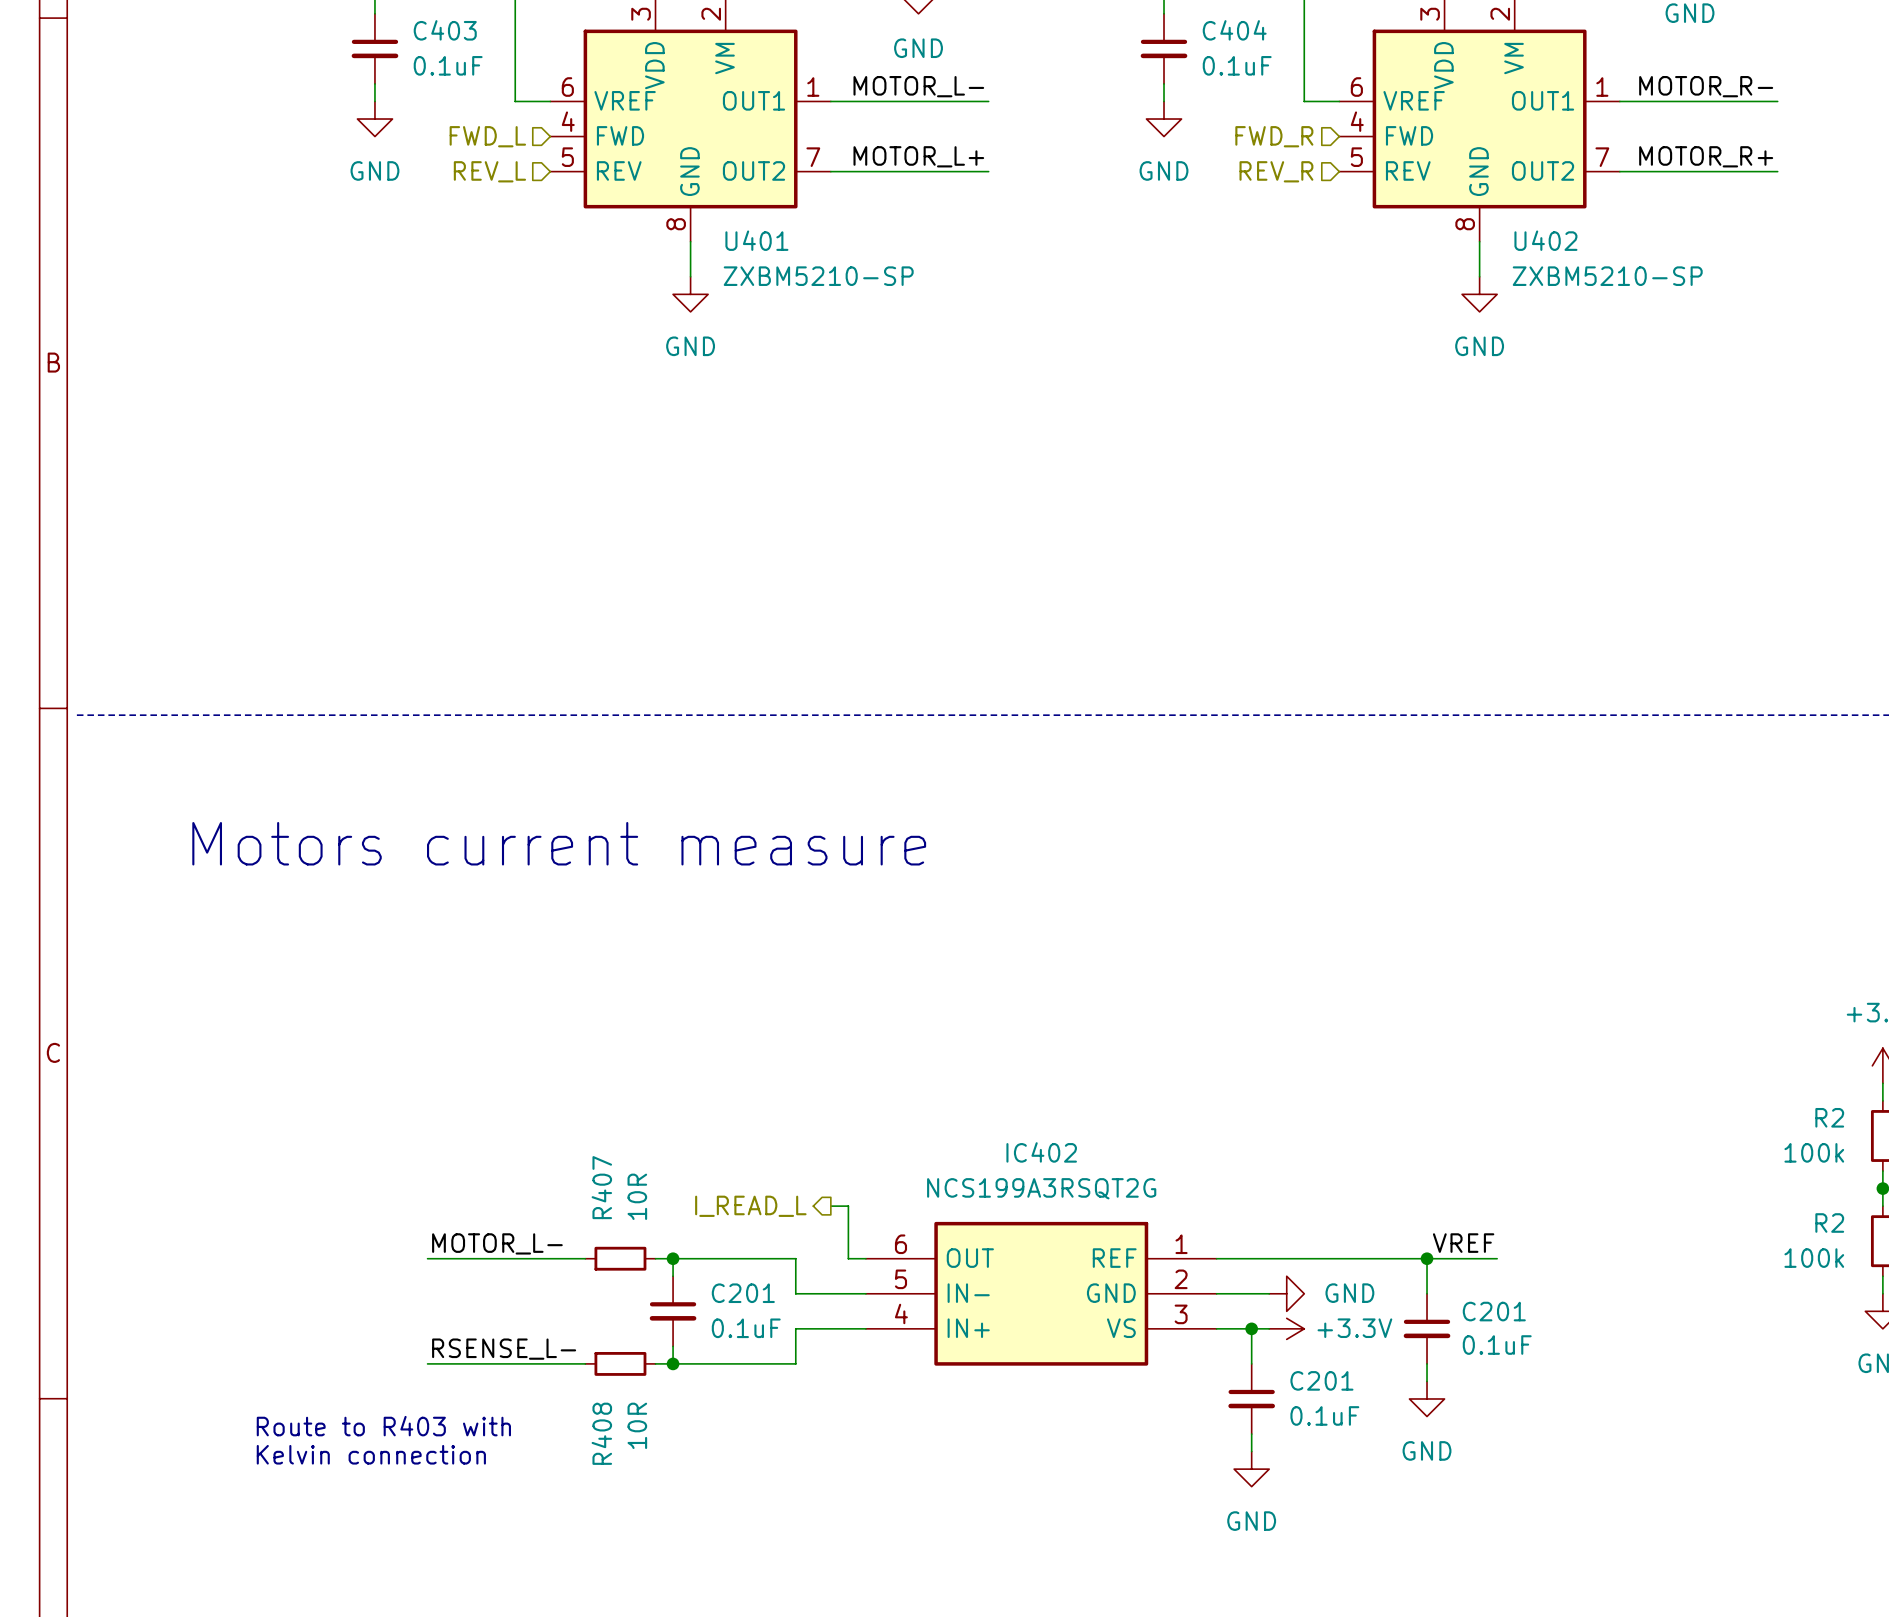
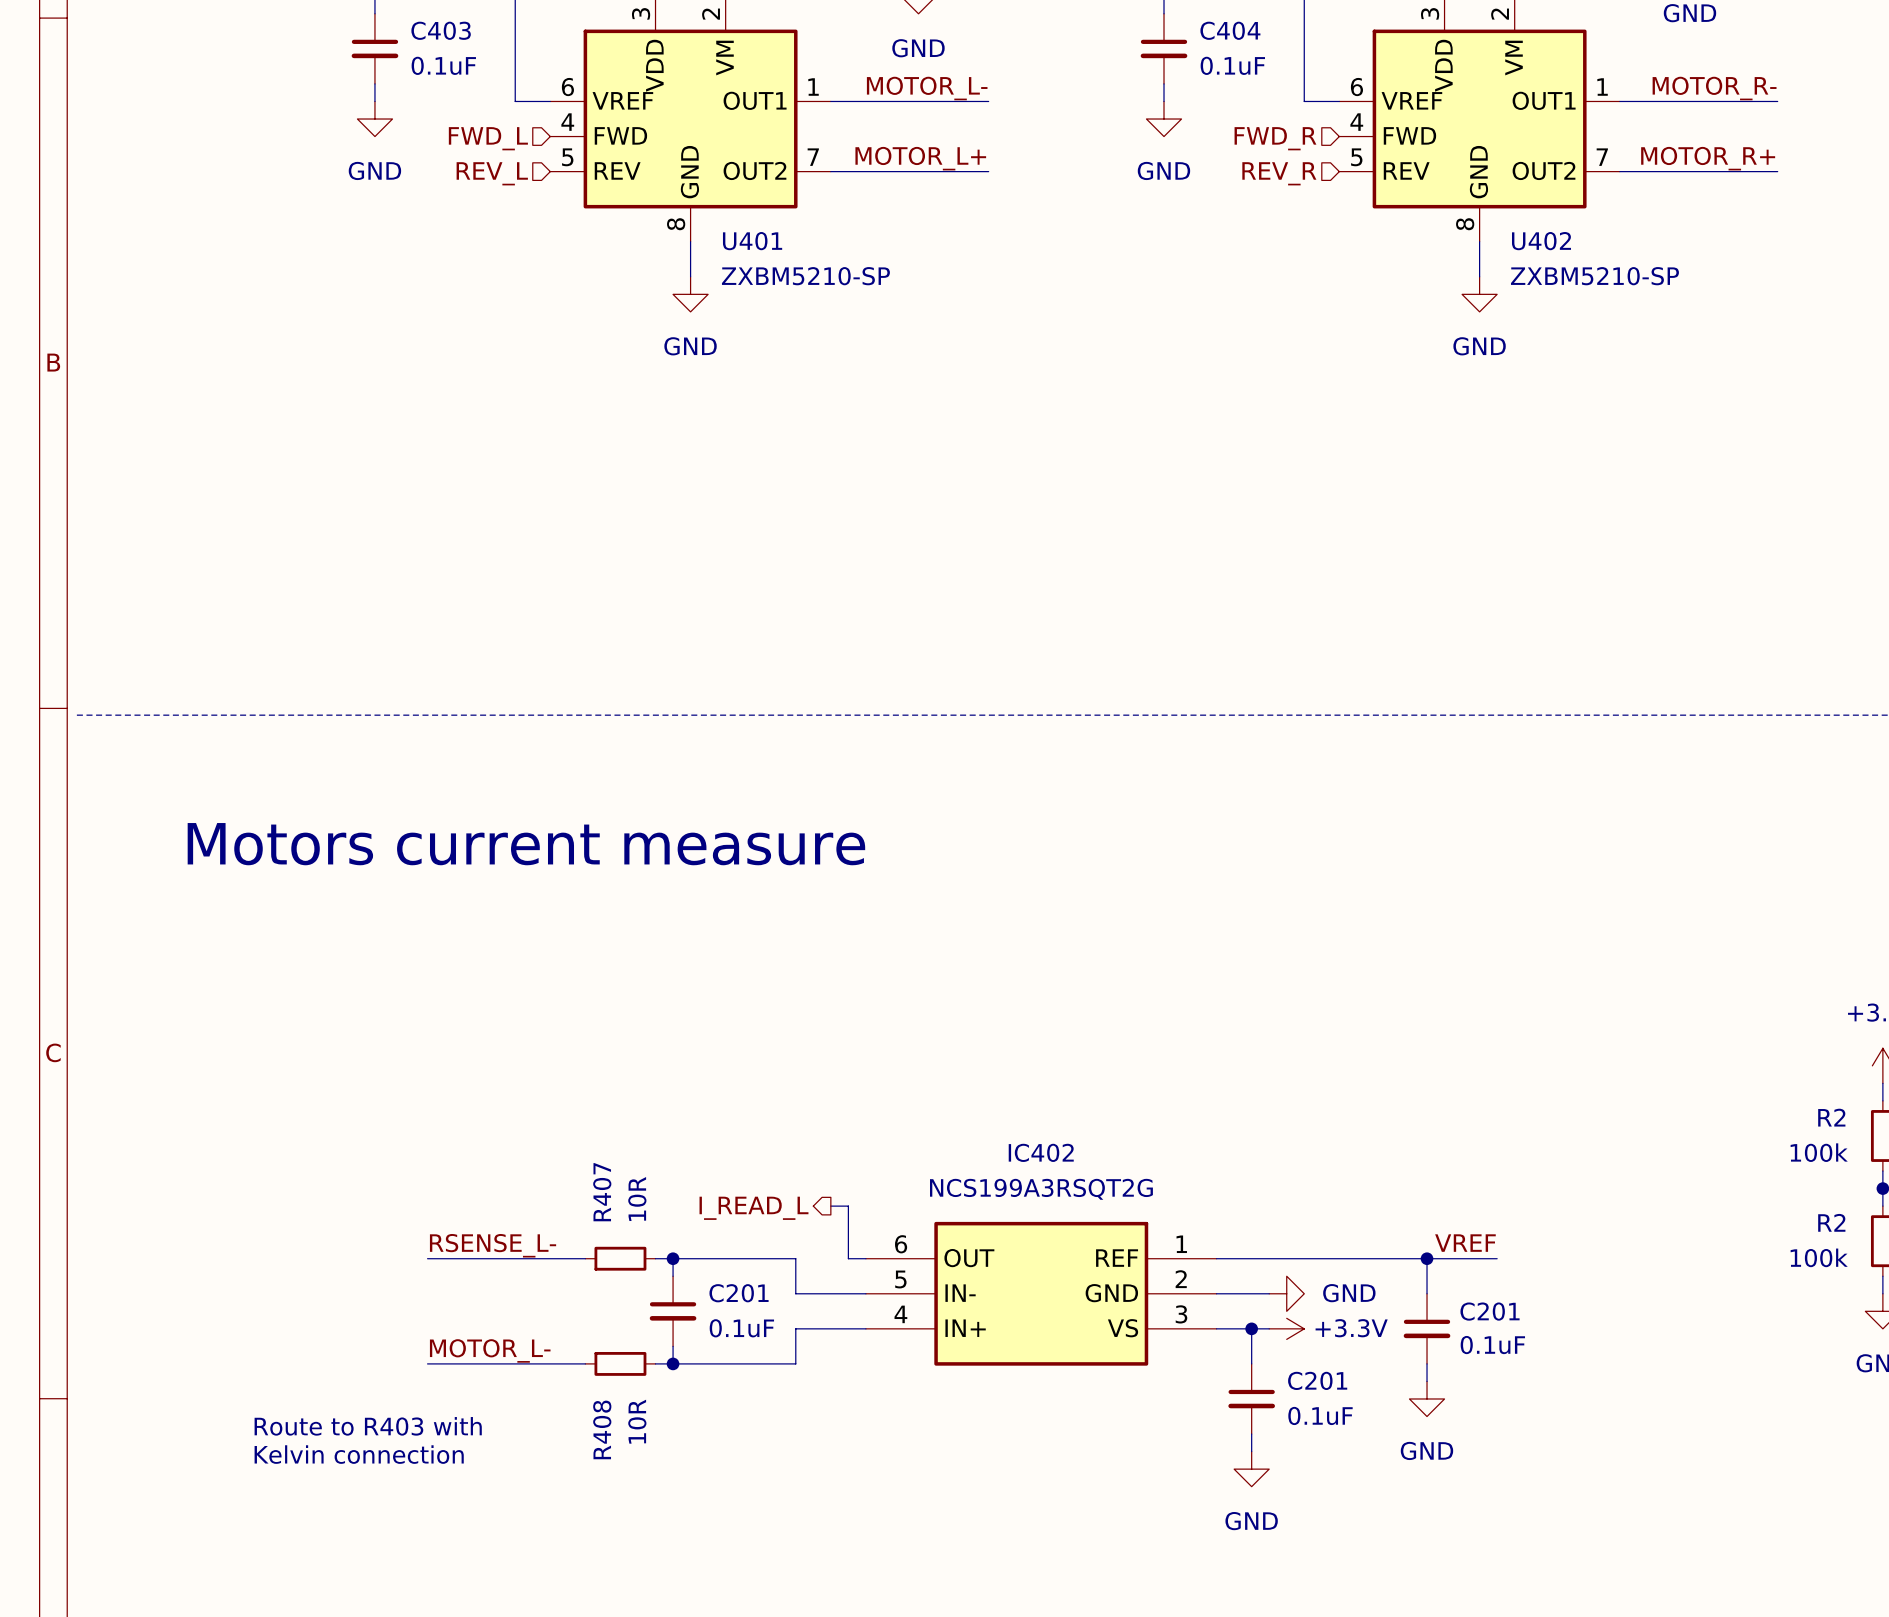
label: MOTOR_L- (497, 1243) -> RSENSE_L- (493, 1245)
label: RSENSE_L- (504, 1349) -> MOTOR_L- (490, 1350)

